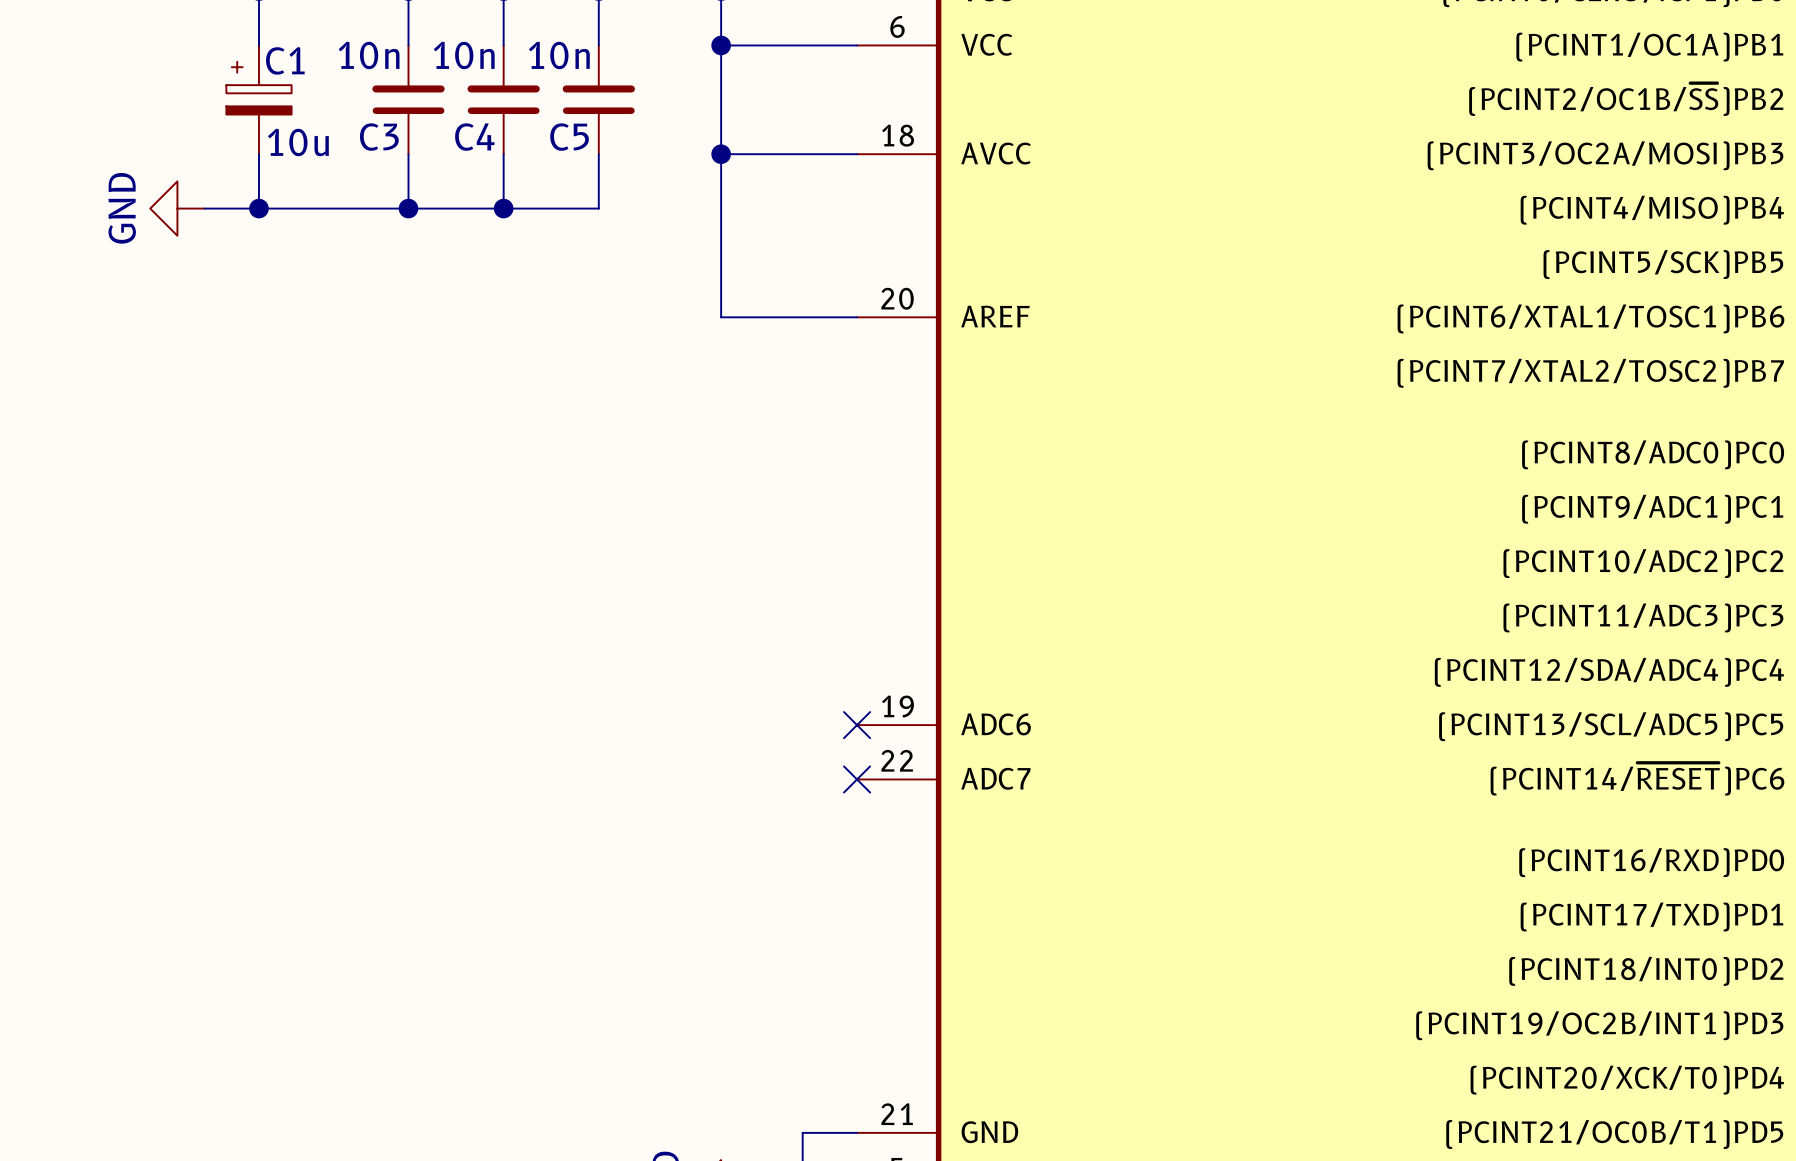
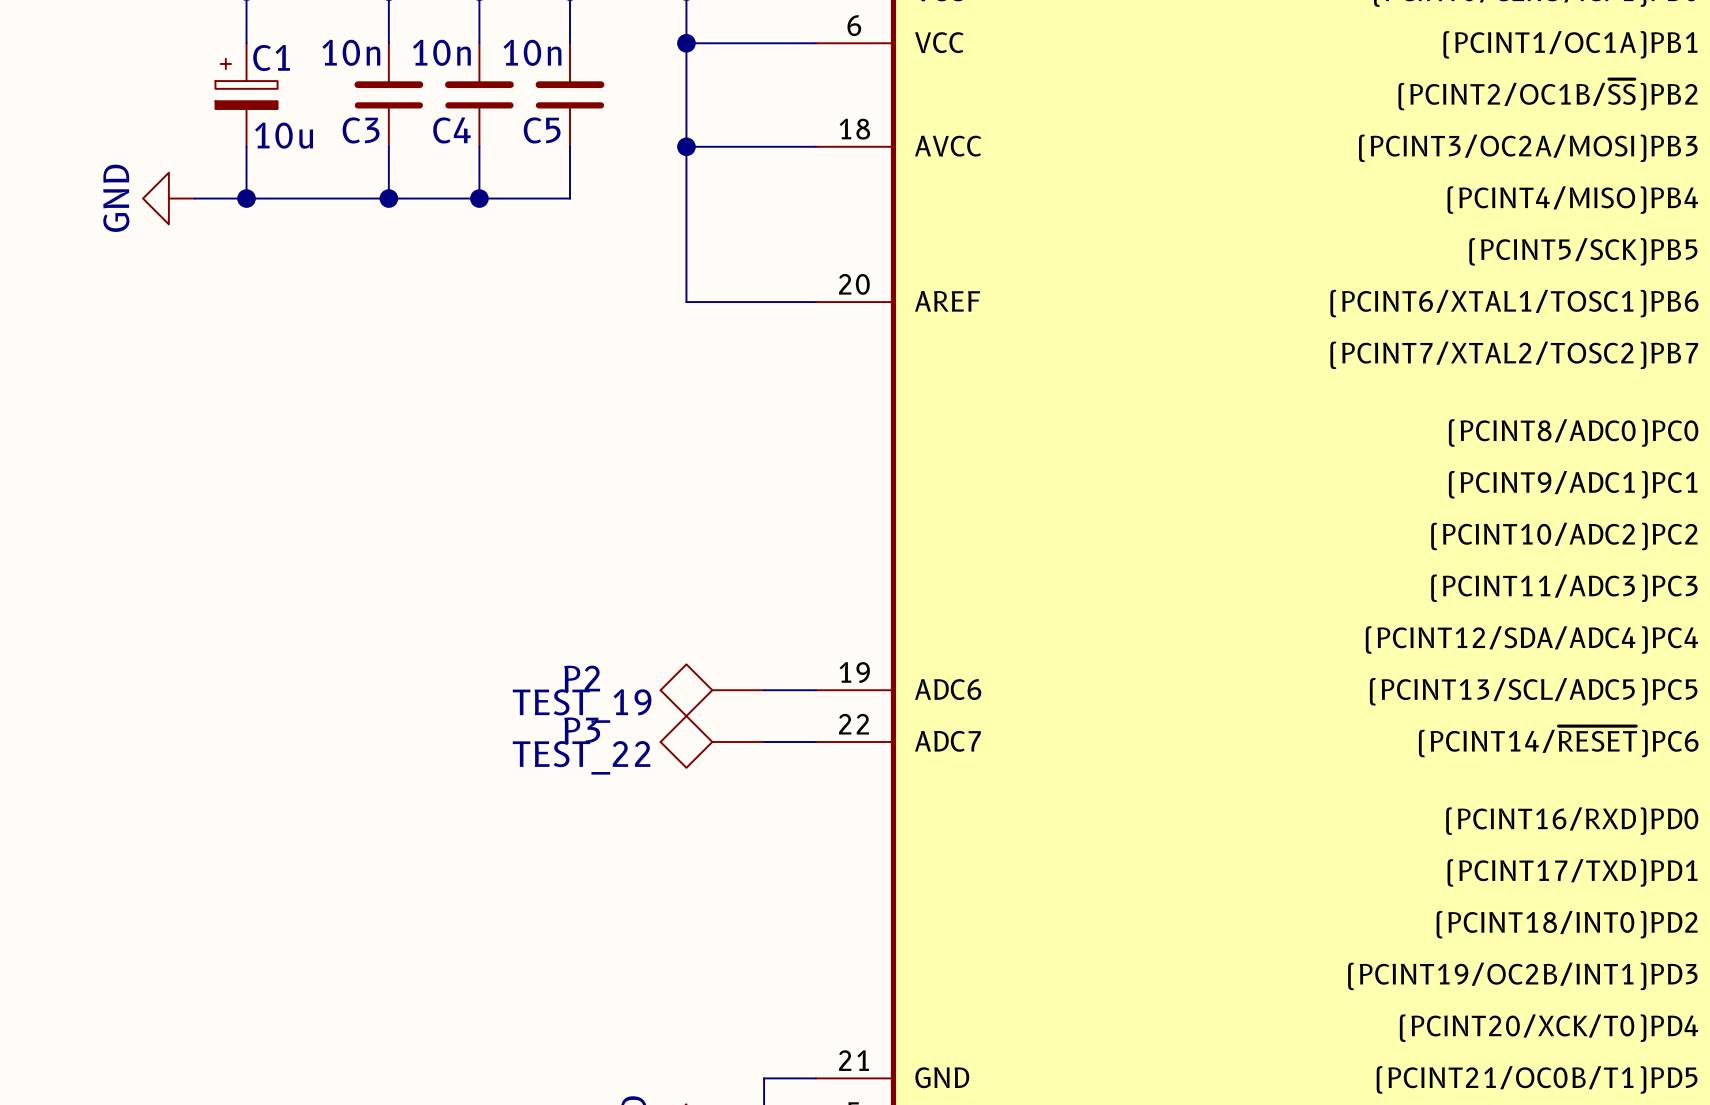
P2: none -> TEST_19 (712, 690)
wire: none -> (764, 690) (815, 690)
no-connect mark: (857, 725) -> none
P3: none -> TEST_22 (712, 741)
wire: none -> (764, 741) (815, 741)
no-connect mark: (857, 779) -> none

